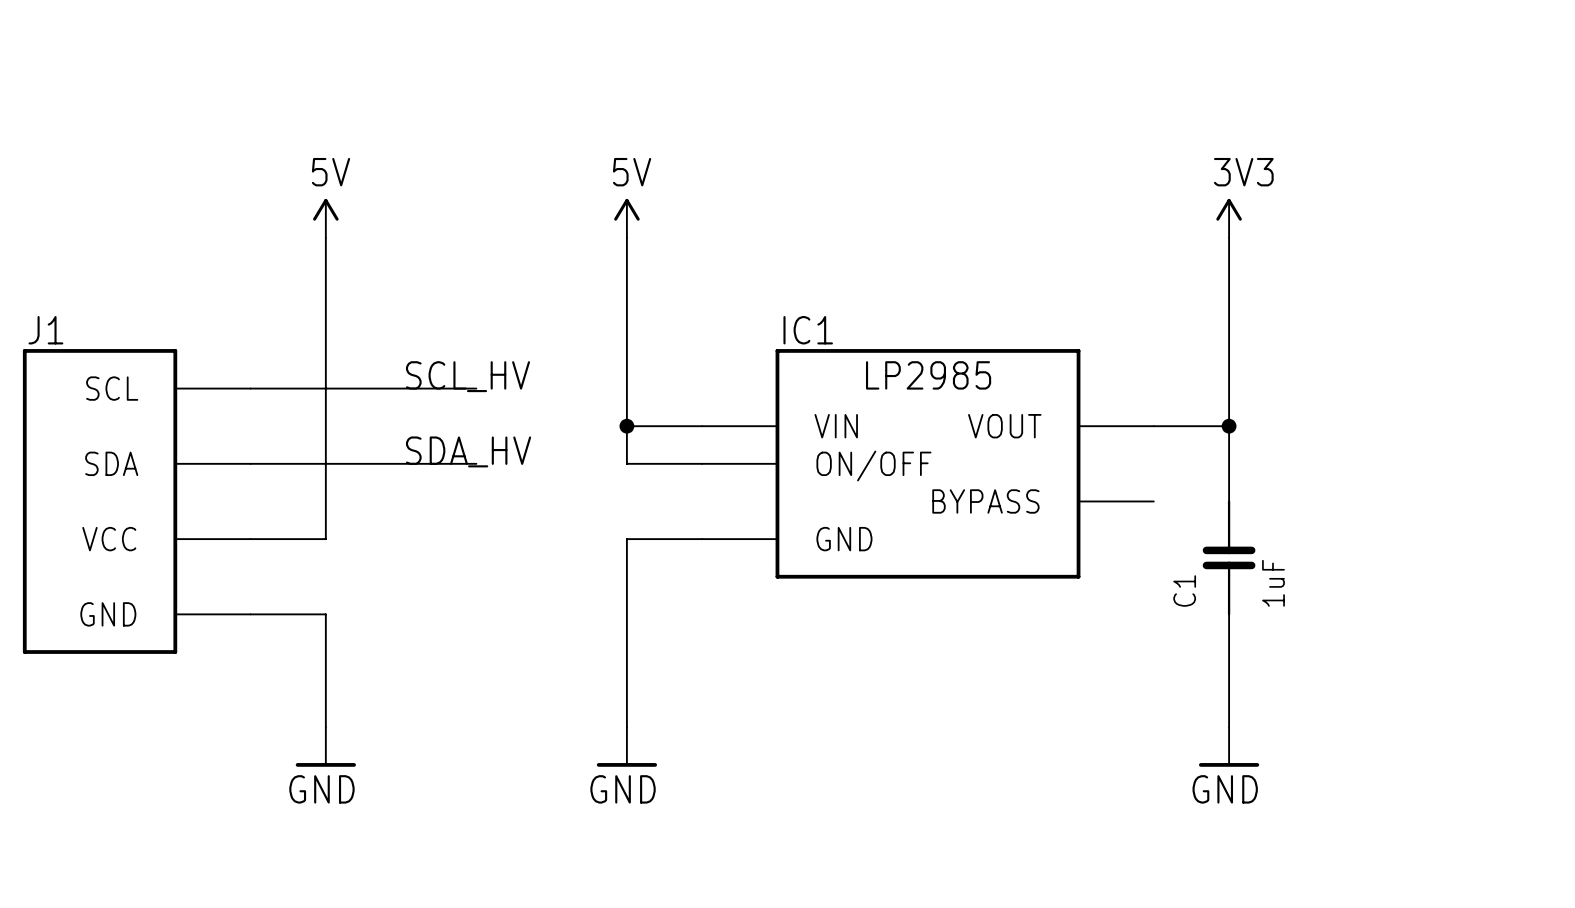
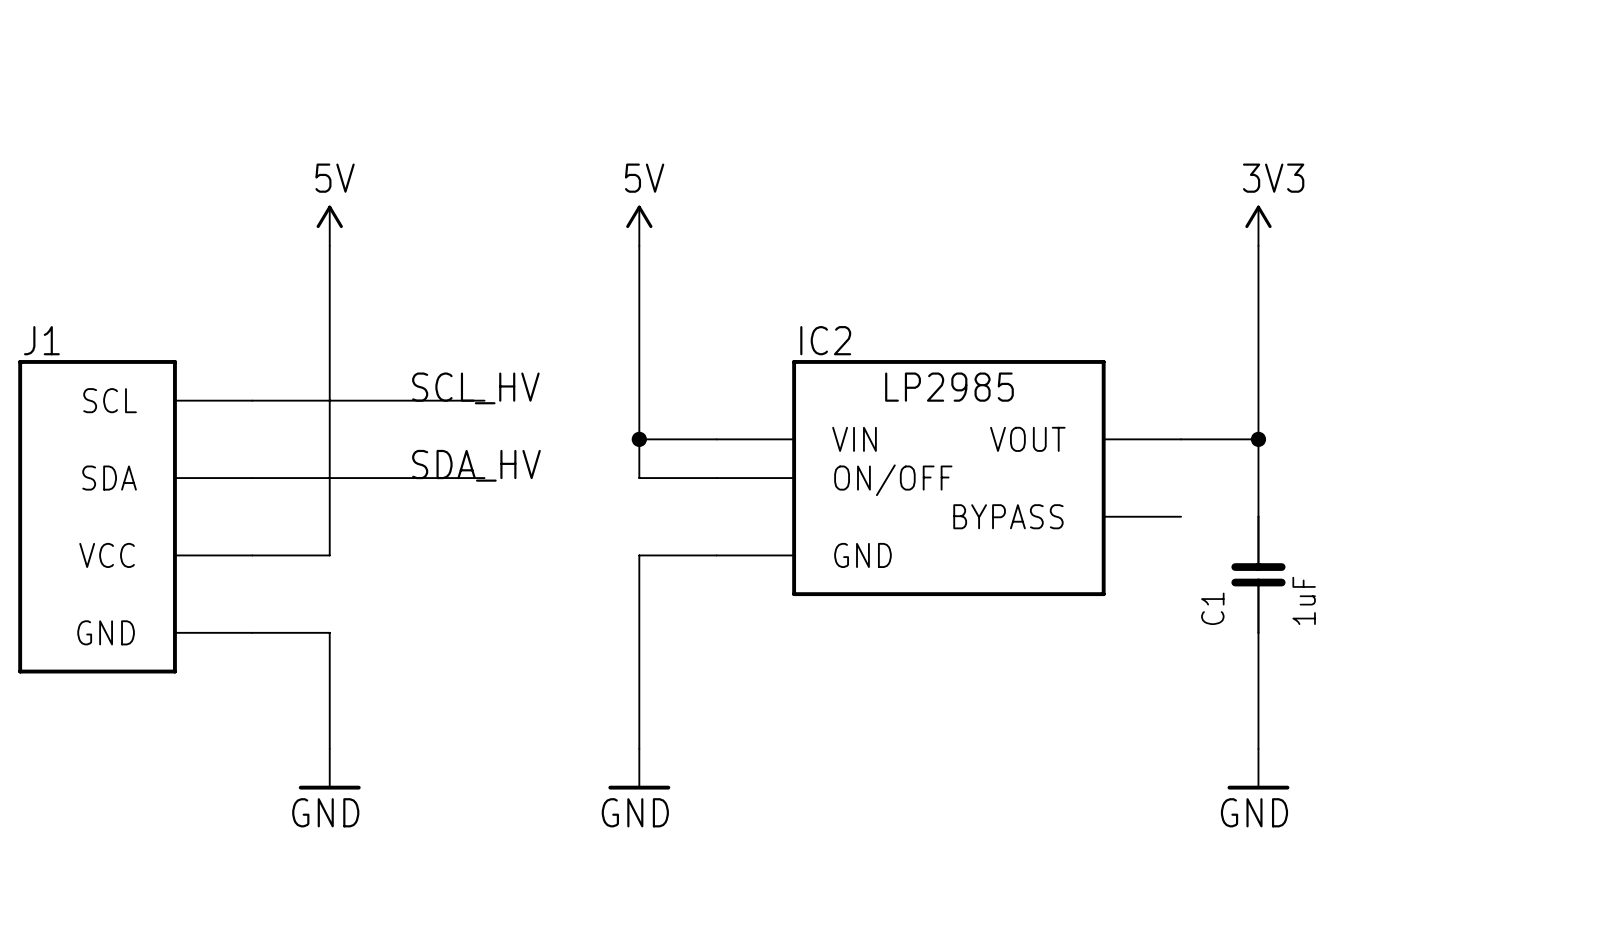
IC1 name: IC1 (808, 330) -> IC2 (825, 340)

